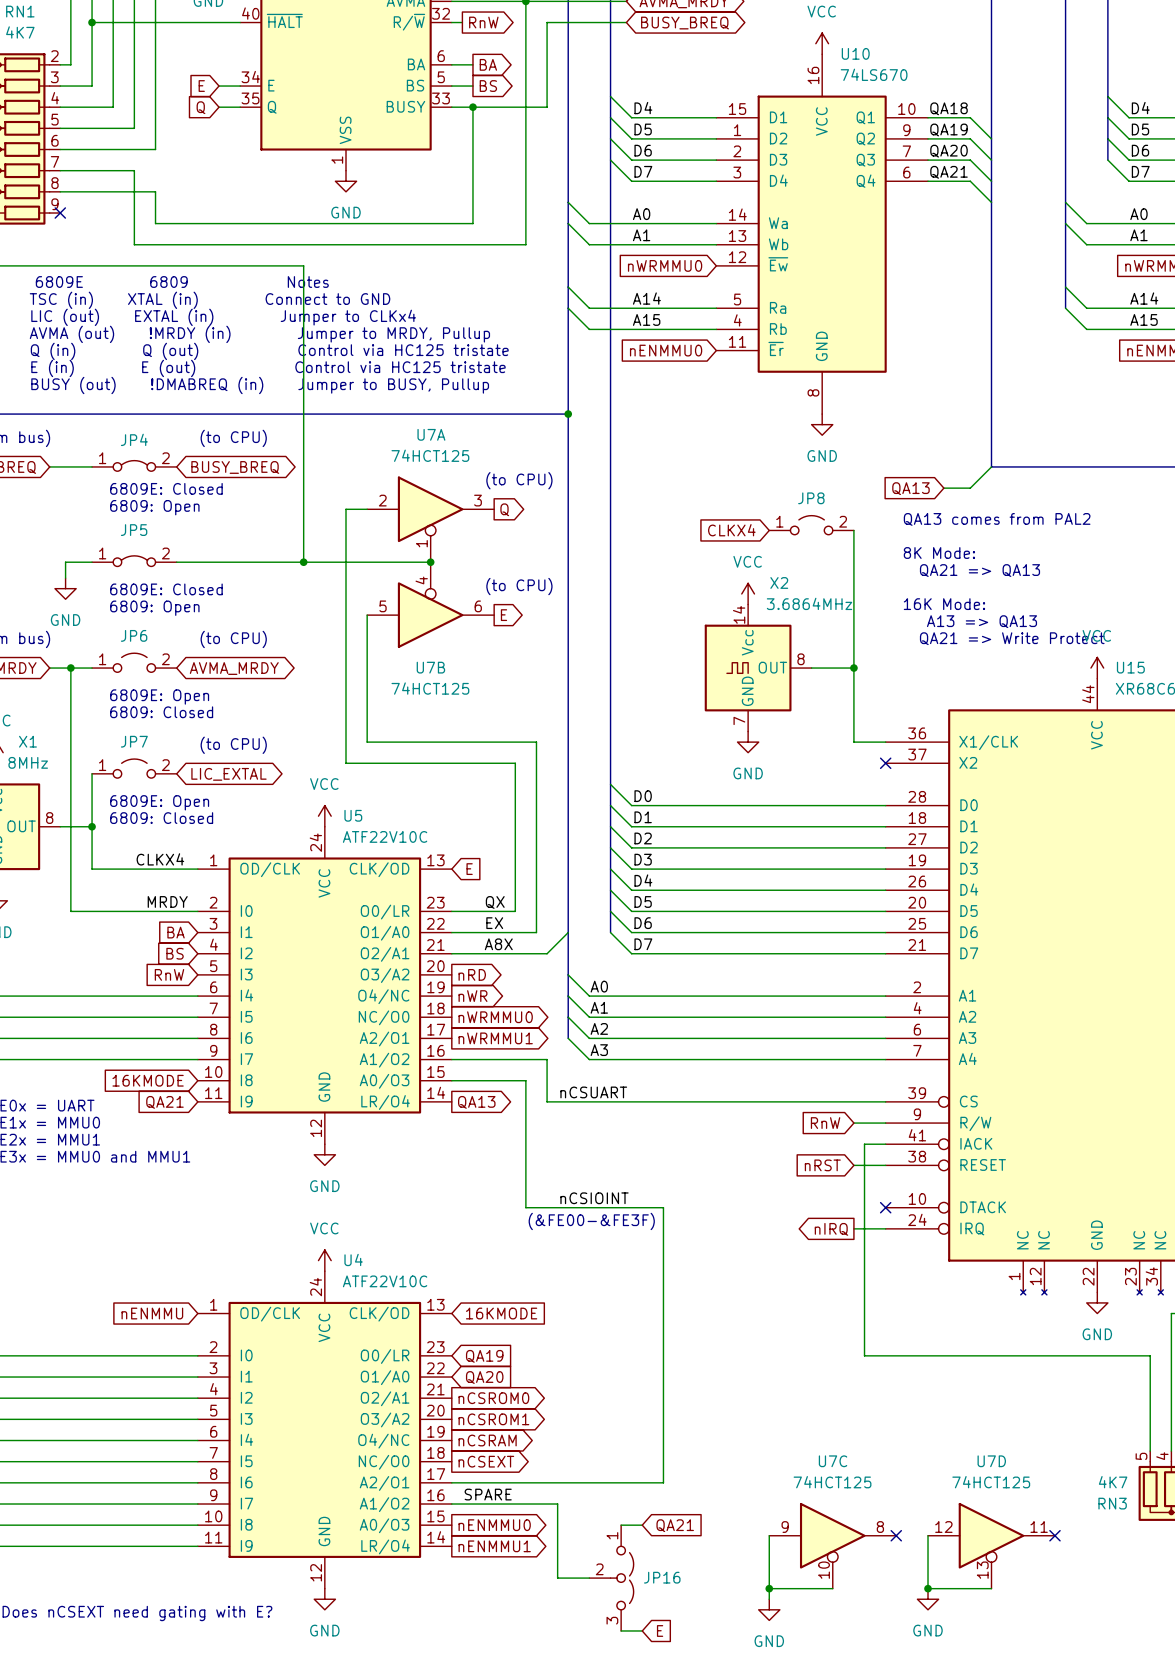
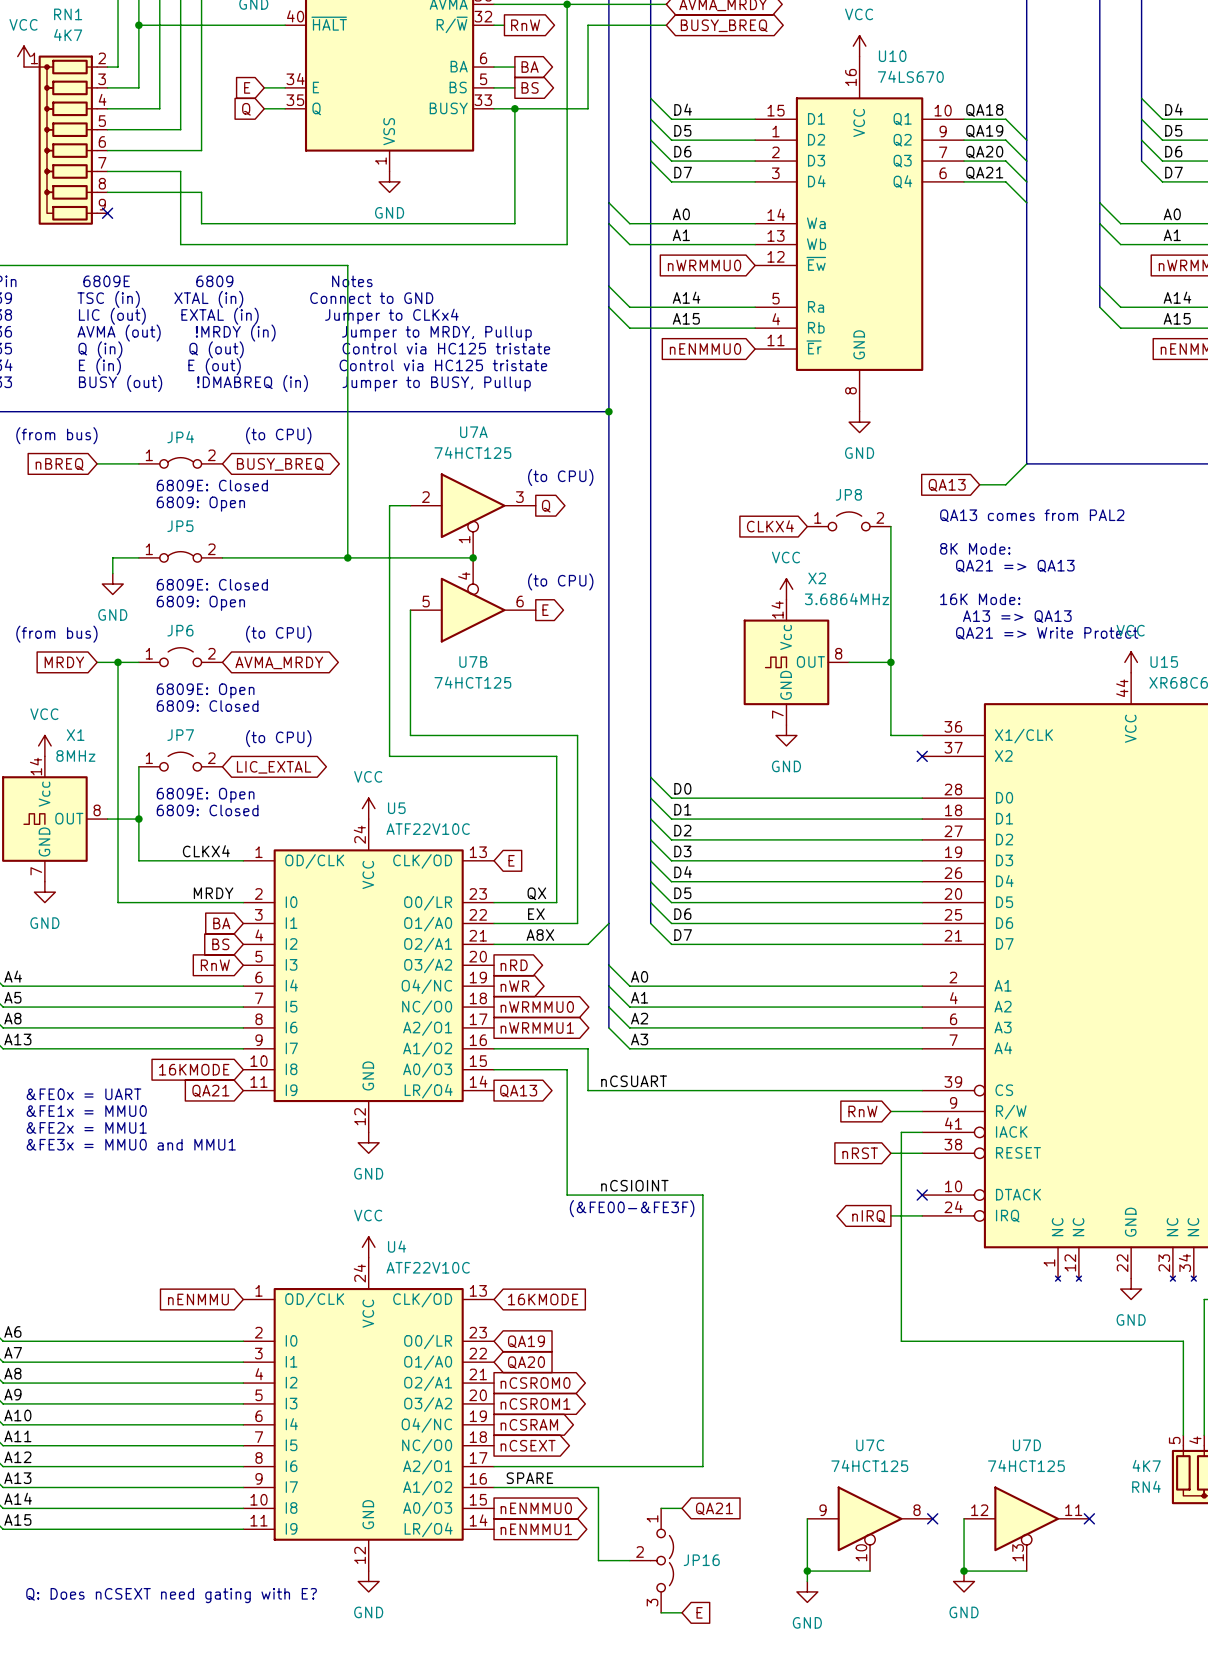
RN3 name: RN3 (1112, 1503) -> RN4 (1146, 1486)

